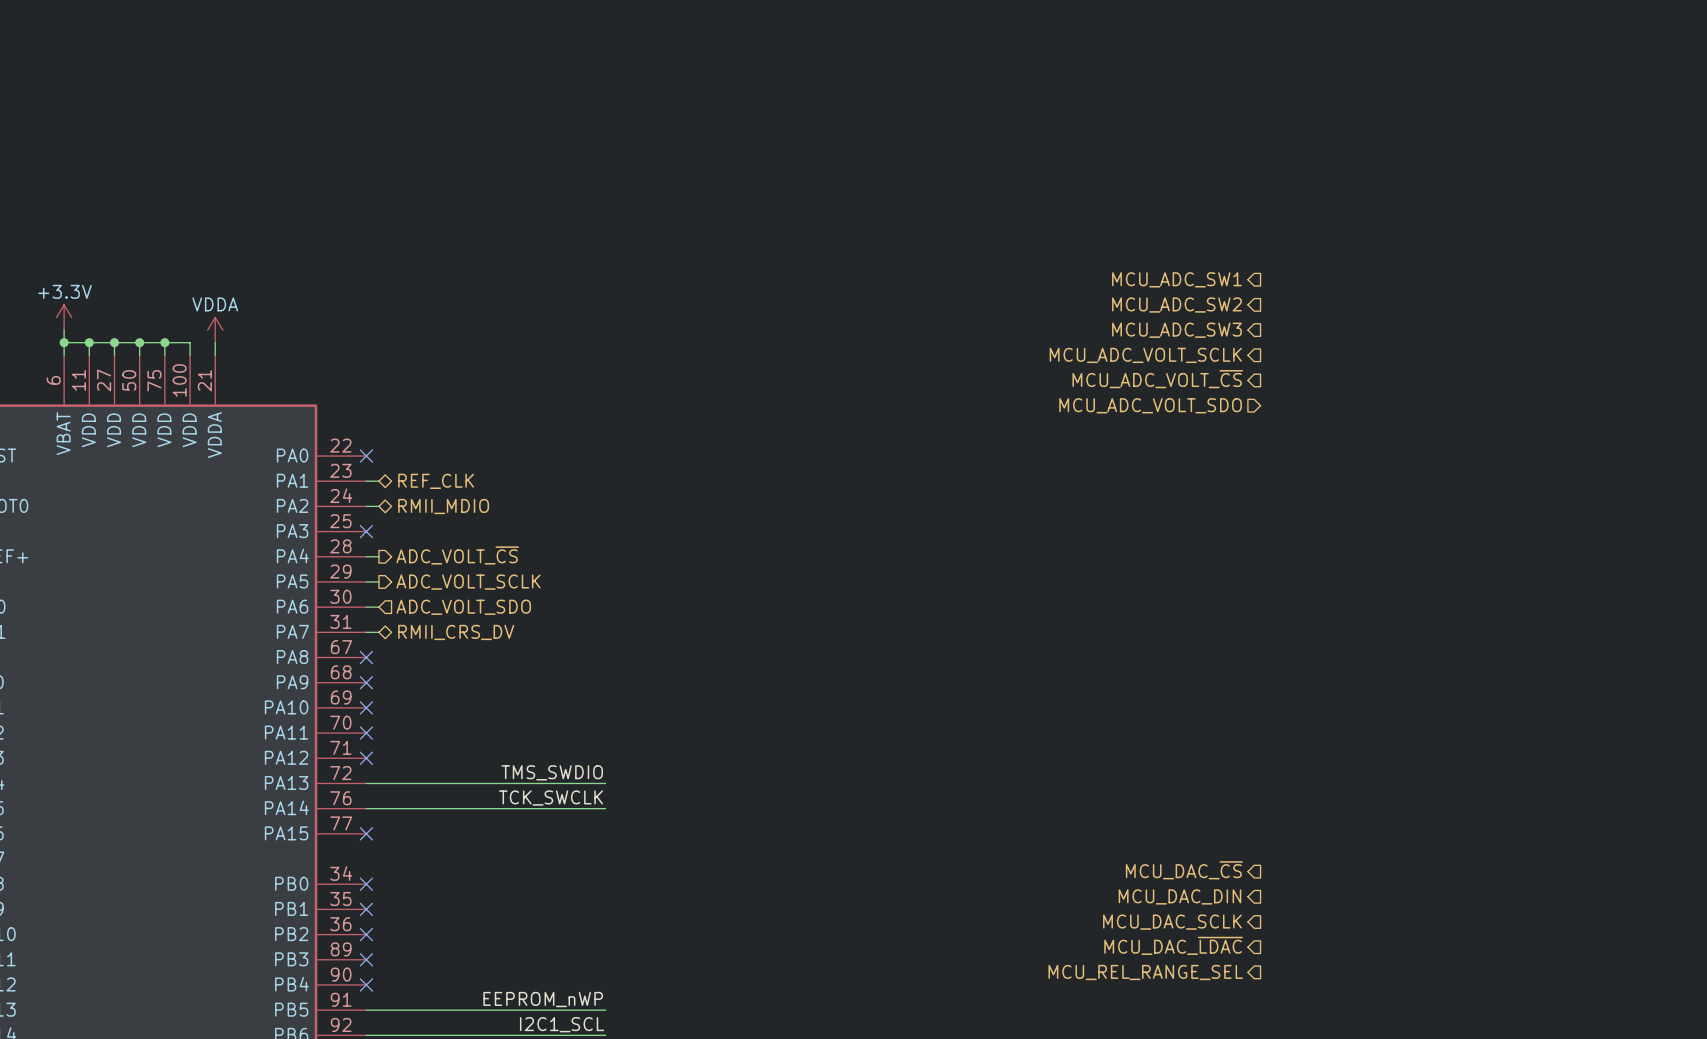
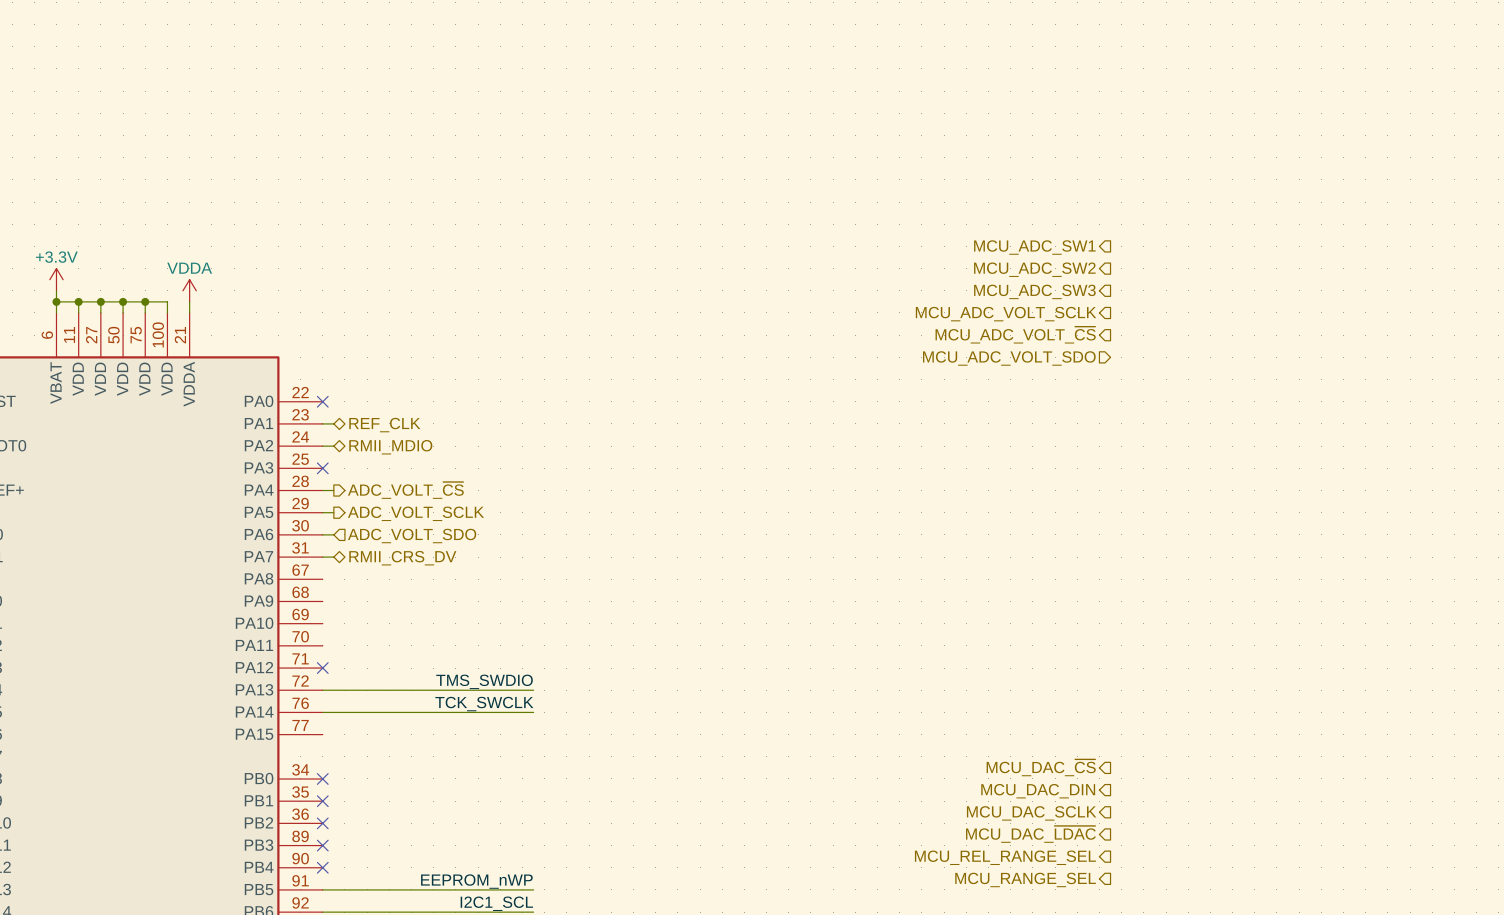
no-connect mark: (366, 657) -> none
no-connect mark: (366, 682) -> none
no-connect mark: (366, 707) -> none
no-connect mark: (366, 733) -> none
no-connect mark: (366, 833) -> none
hierarchical label: none -> MCU_RANGE_SEL (1025, 879)

